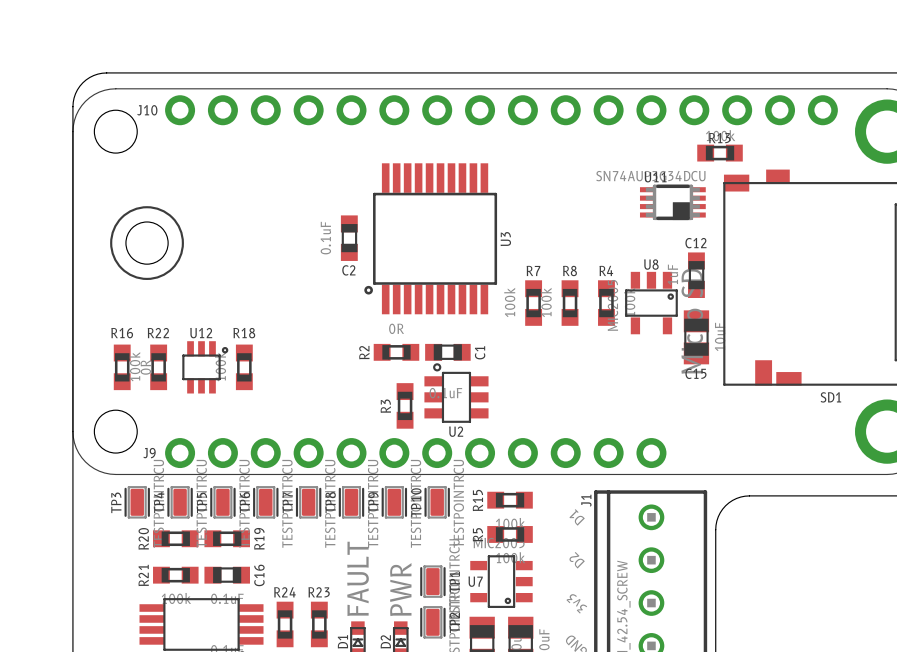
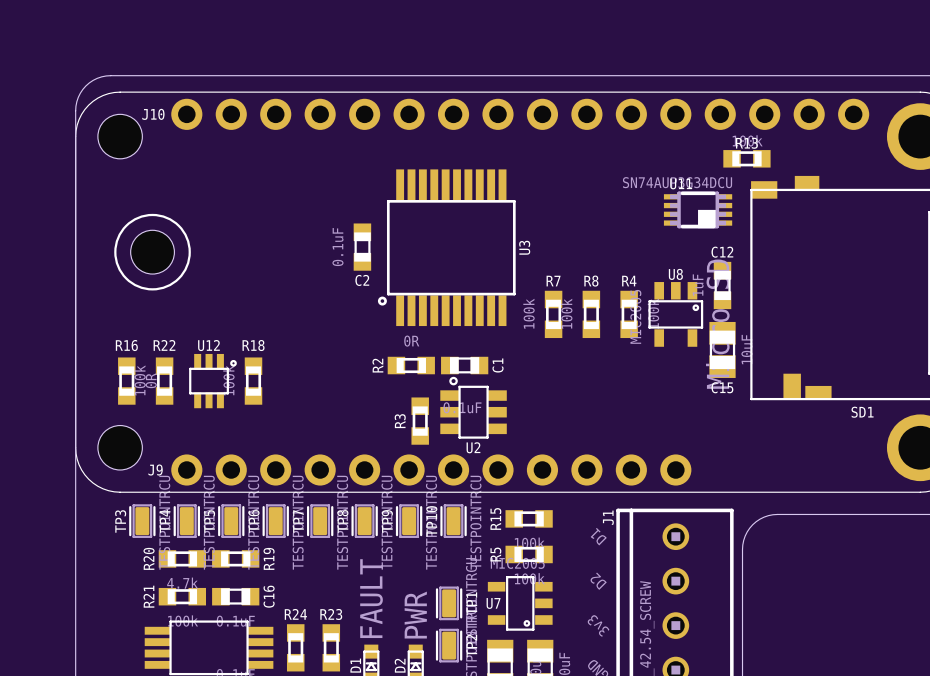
R20 value: none -> 4.7k (182, 583)

